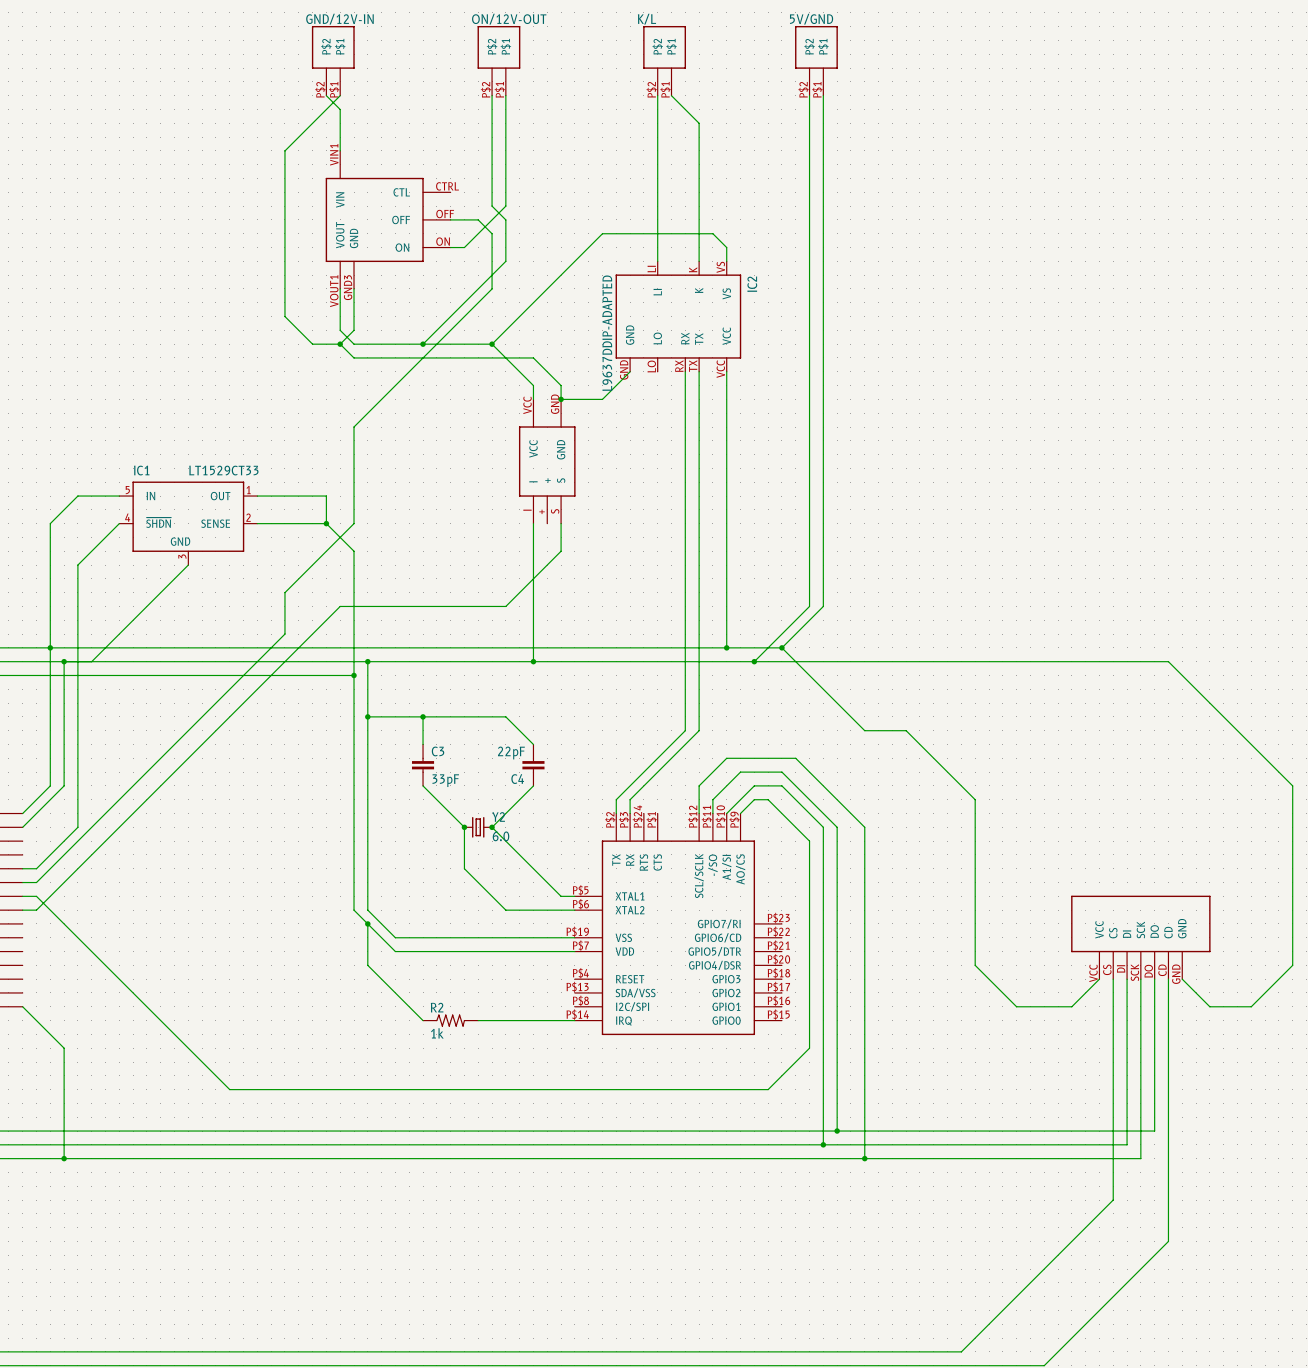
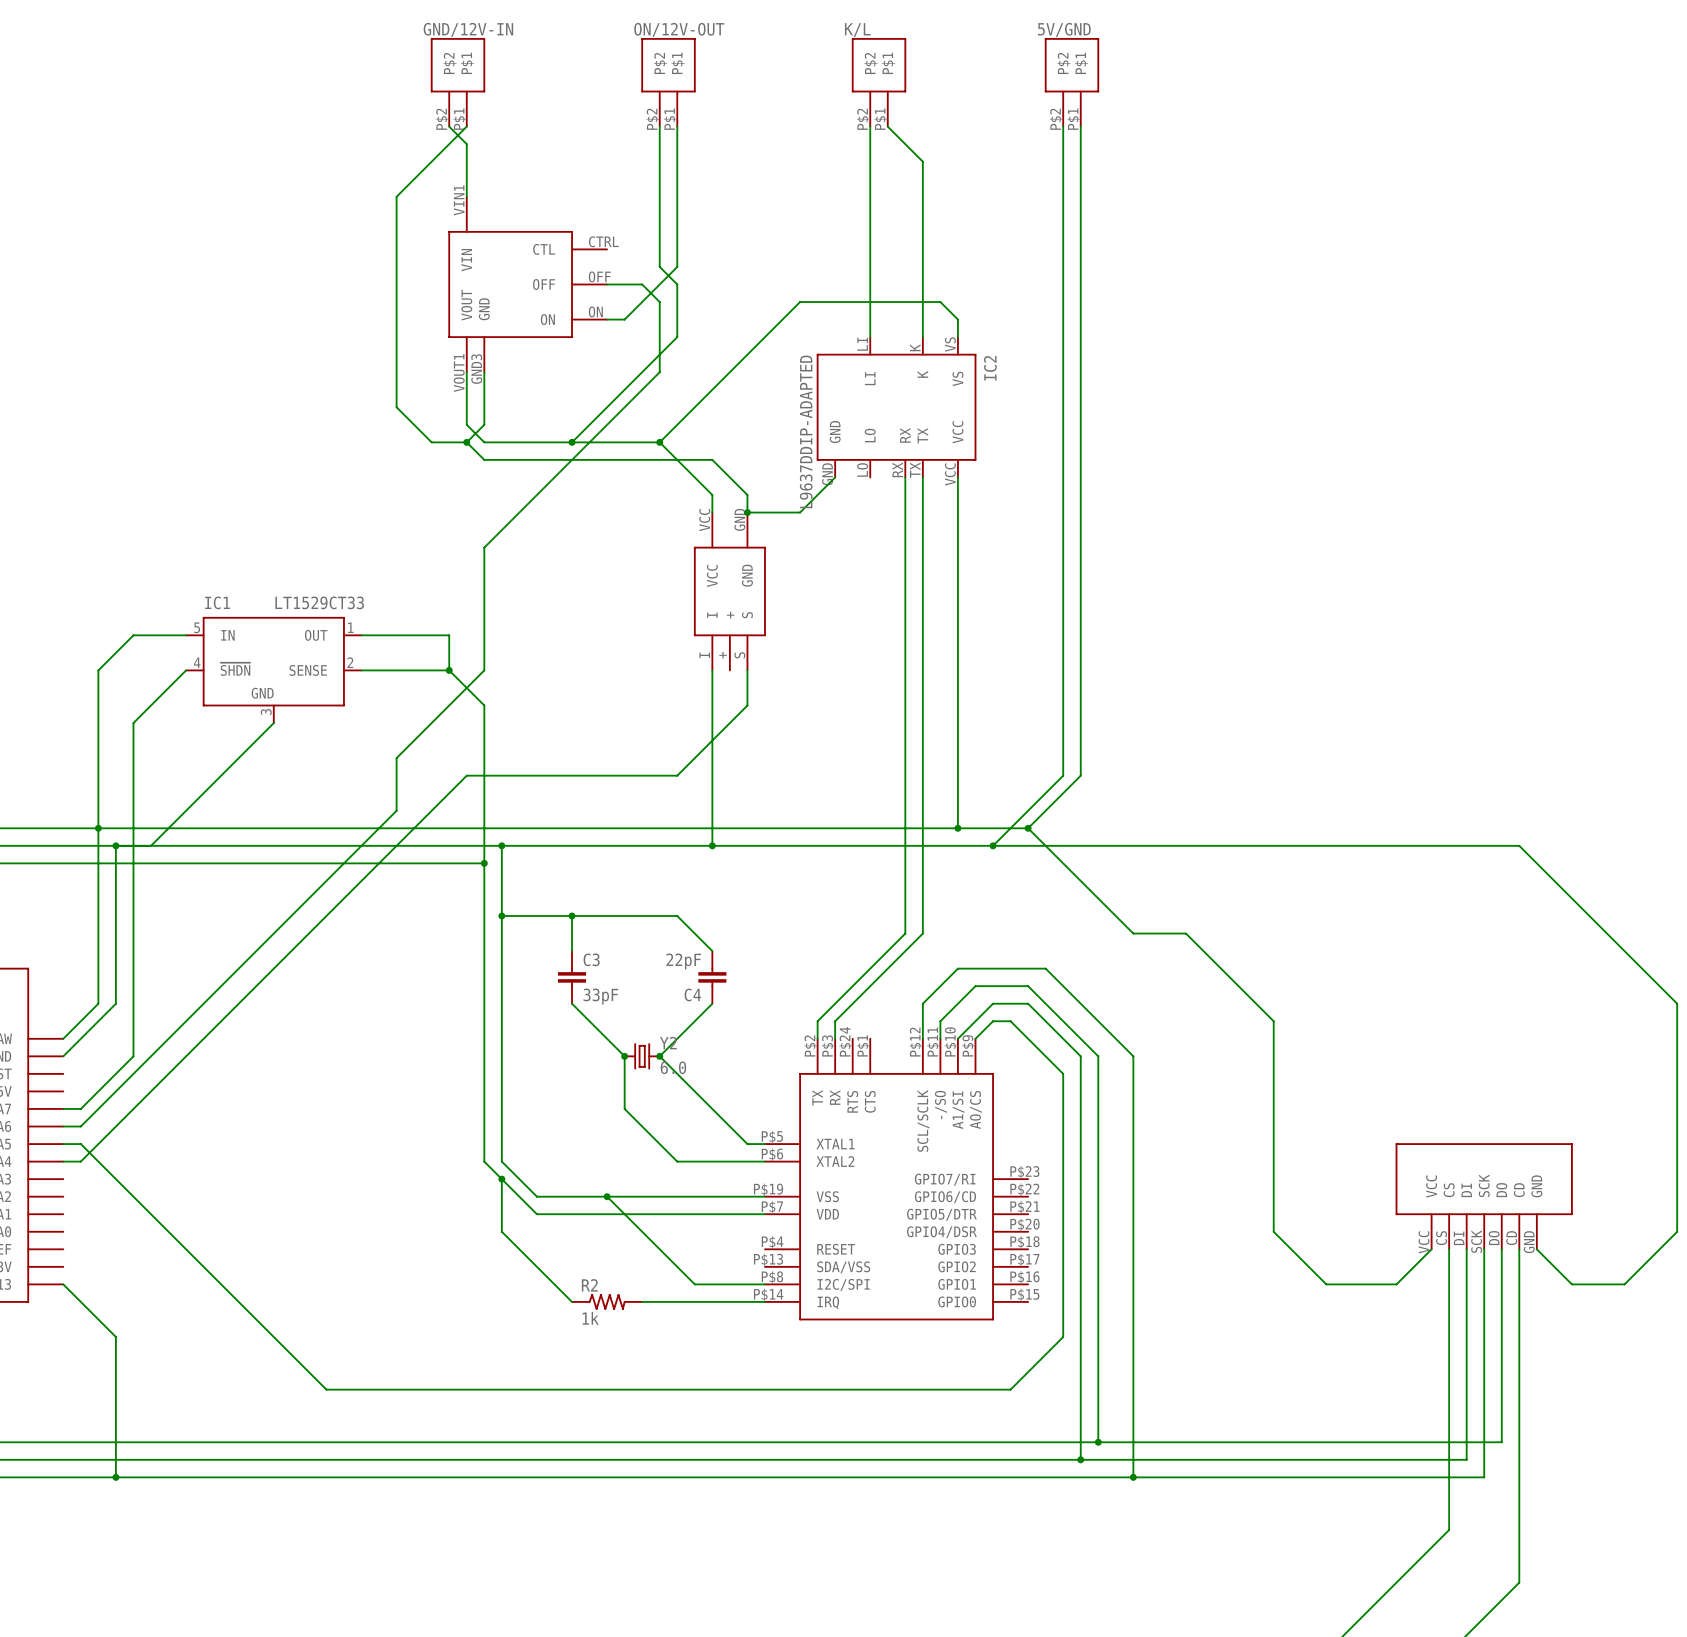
wire: none -> (607, 1196) (694, 1284) (764, 1284)
junction: none -> (607, 1196)

